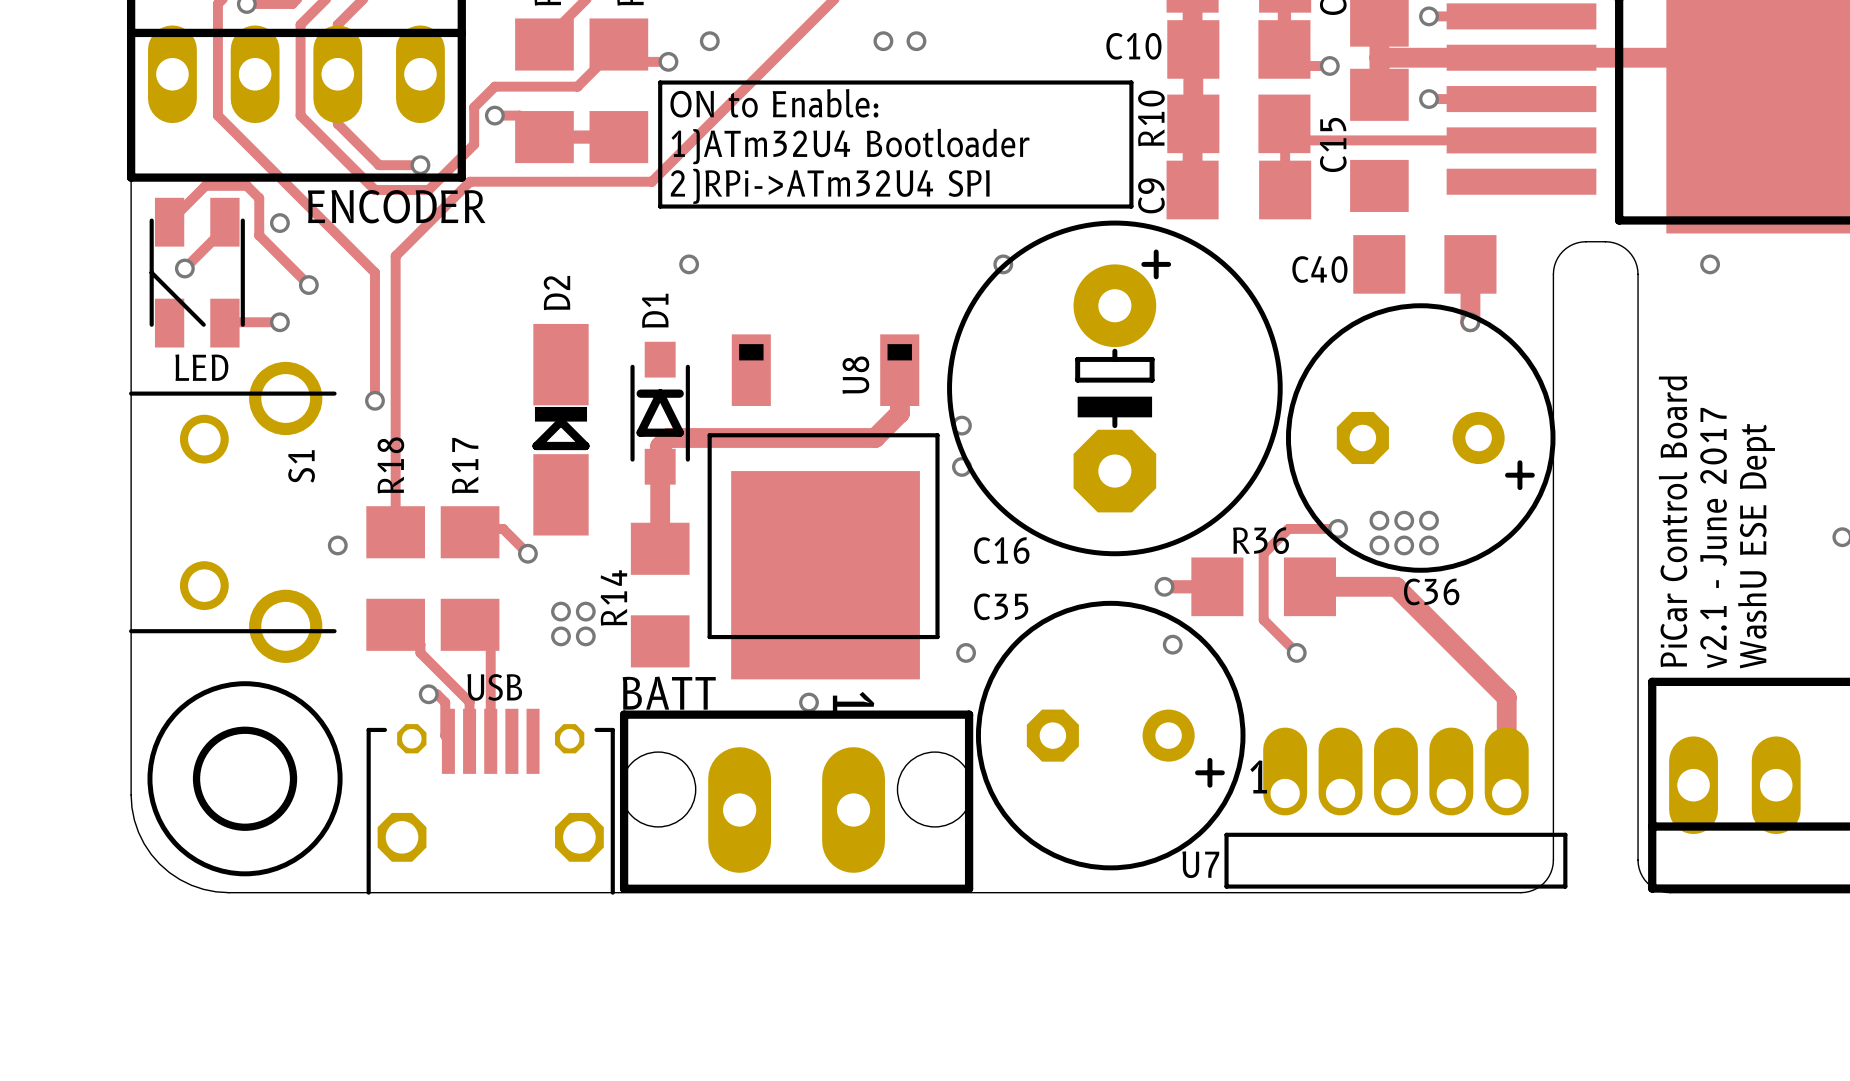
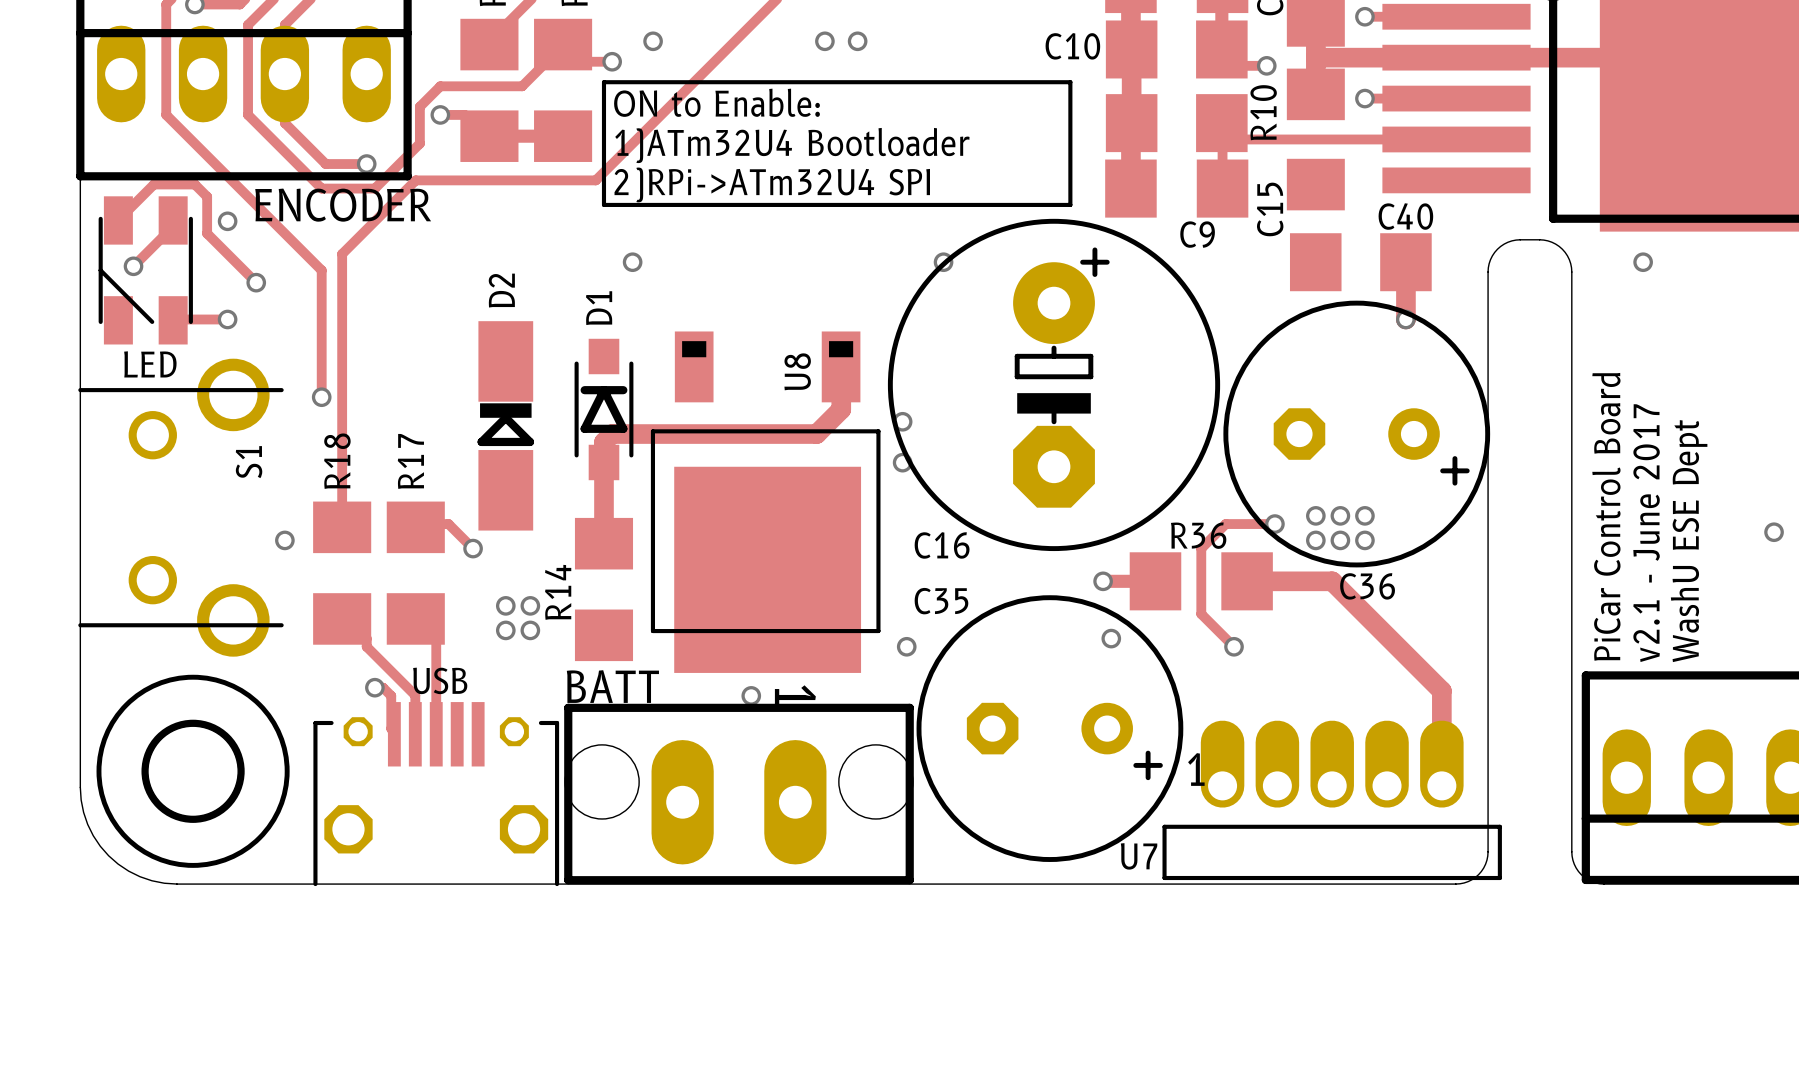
R10 name position: R10 (1151, 118) -> R10 (1263, 112)
C15 name position: C15 (1333, 144) -> C15 (1270, 209)
C9 name rotation: 0° (1151, 195) -> 90° clockwise (1197, 234)
C9 name position: C9 (1151, 195) -> C9 (1197, 234)
C40 name position: C40 (1319, 269) -> C40 (1405, 216)

